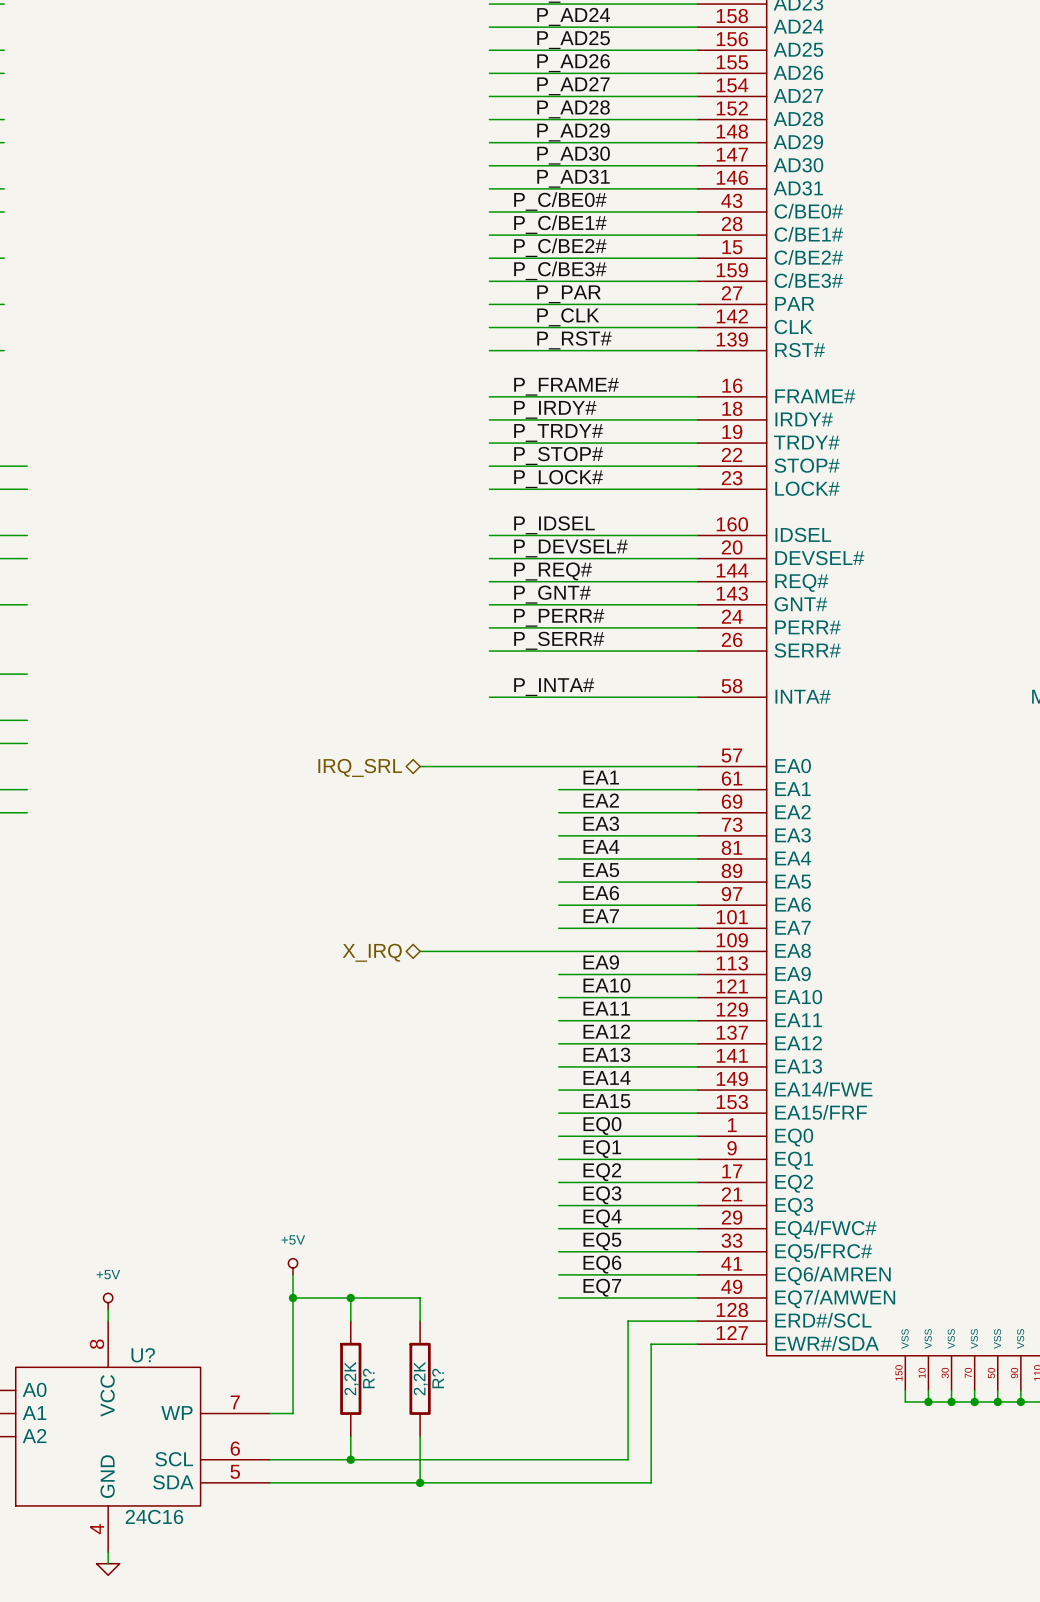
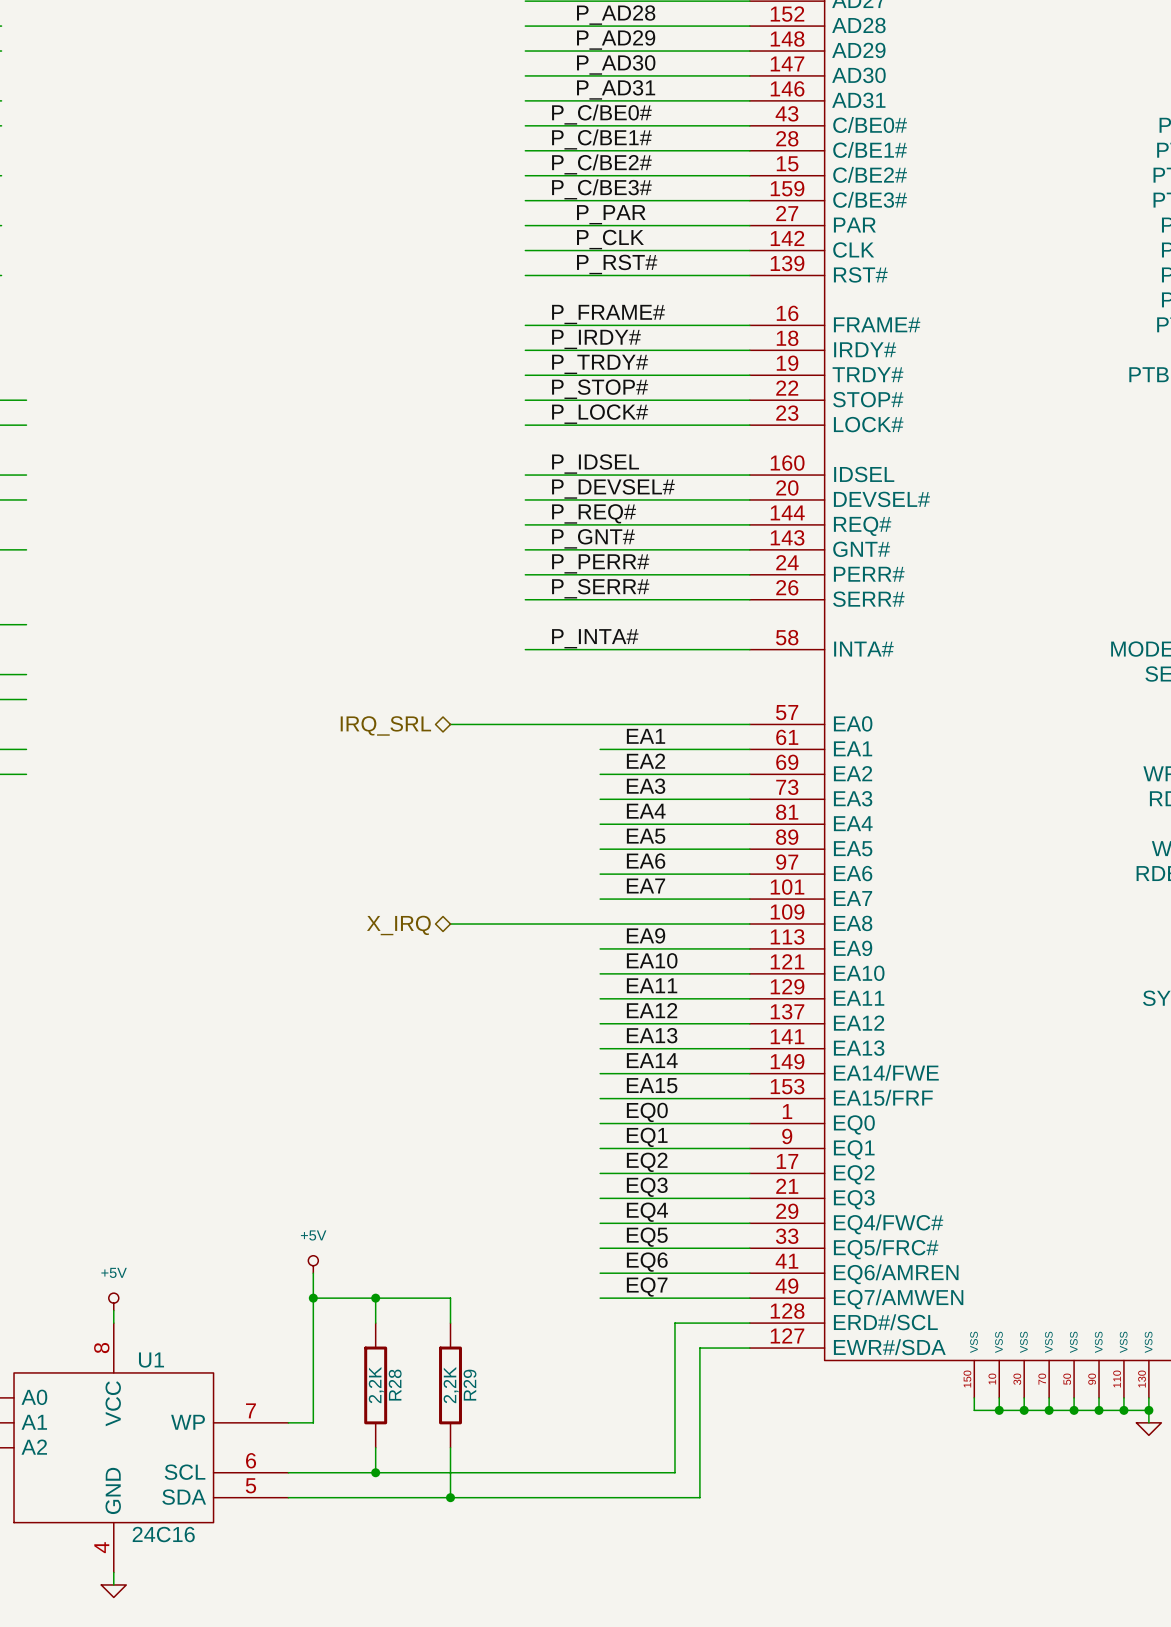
U? name: U? (143, 1355) -> U1 (151, 1360)
R? name: R? (368, 1378) -> R28 (395, 1385)
R? name: R? (438, 1378) -> R29 (469, 1385)

